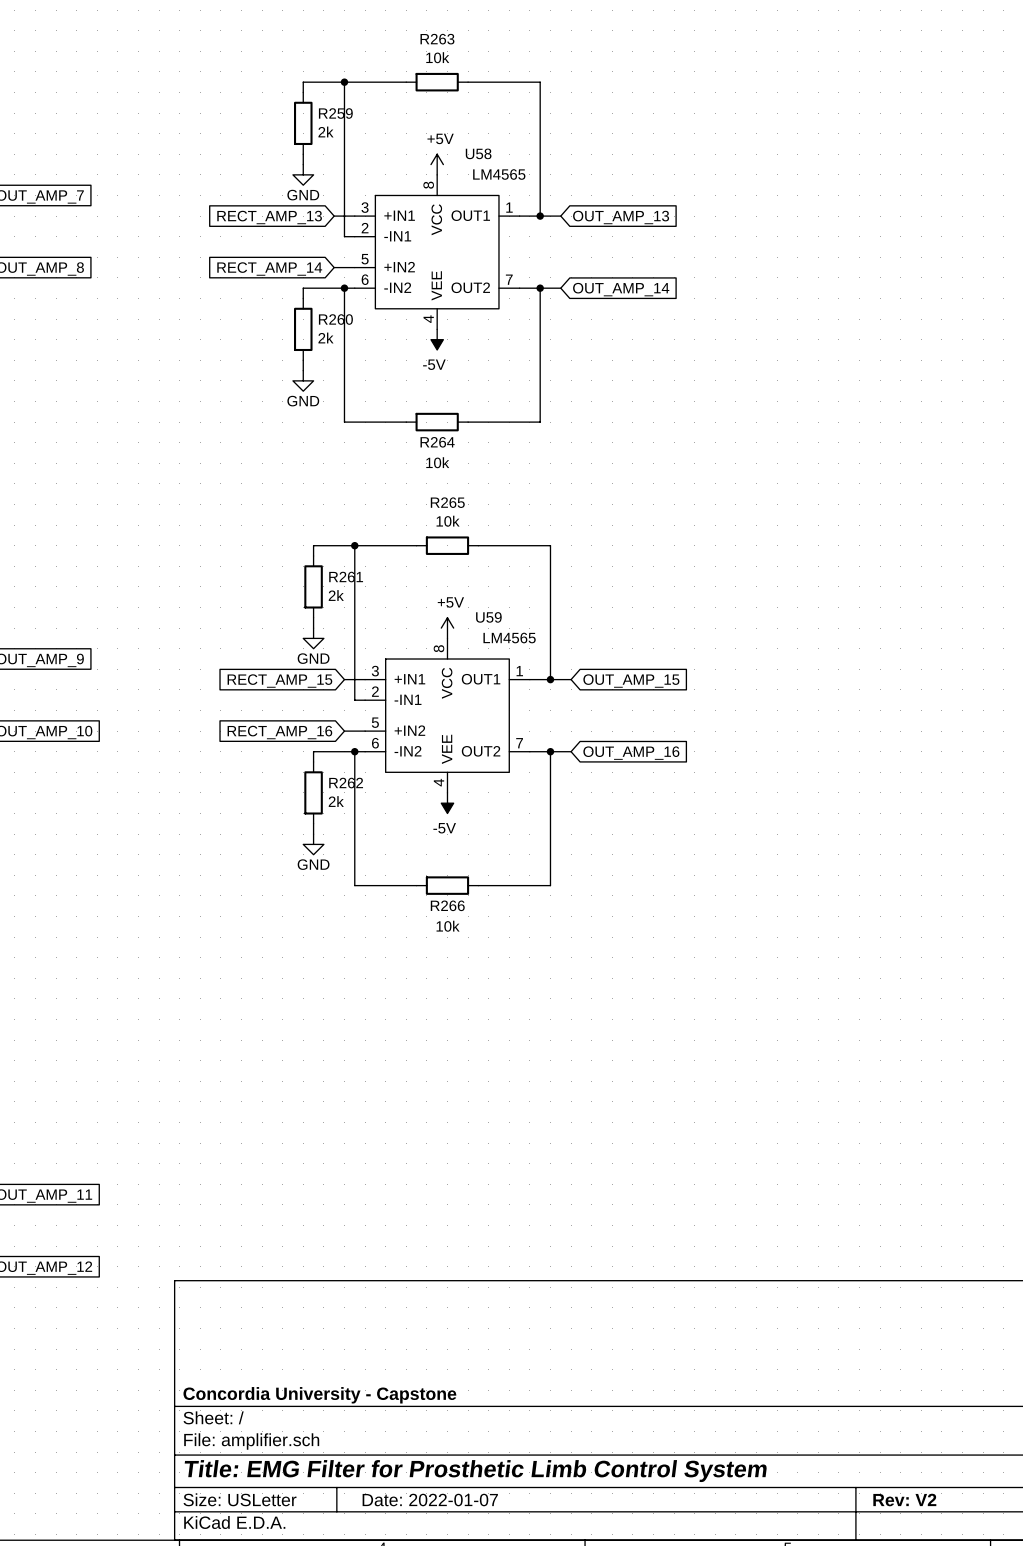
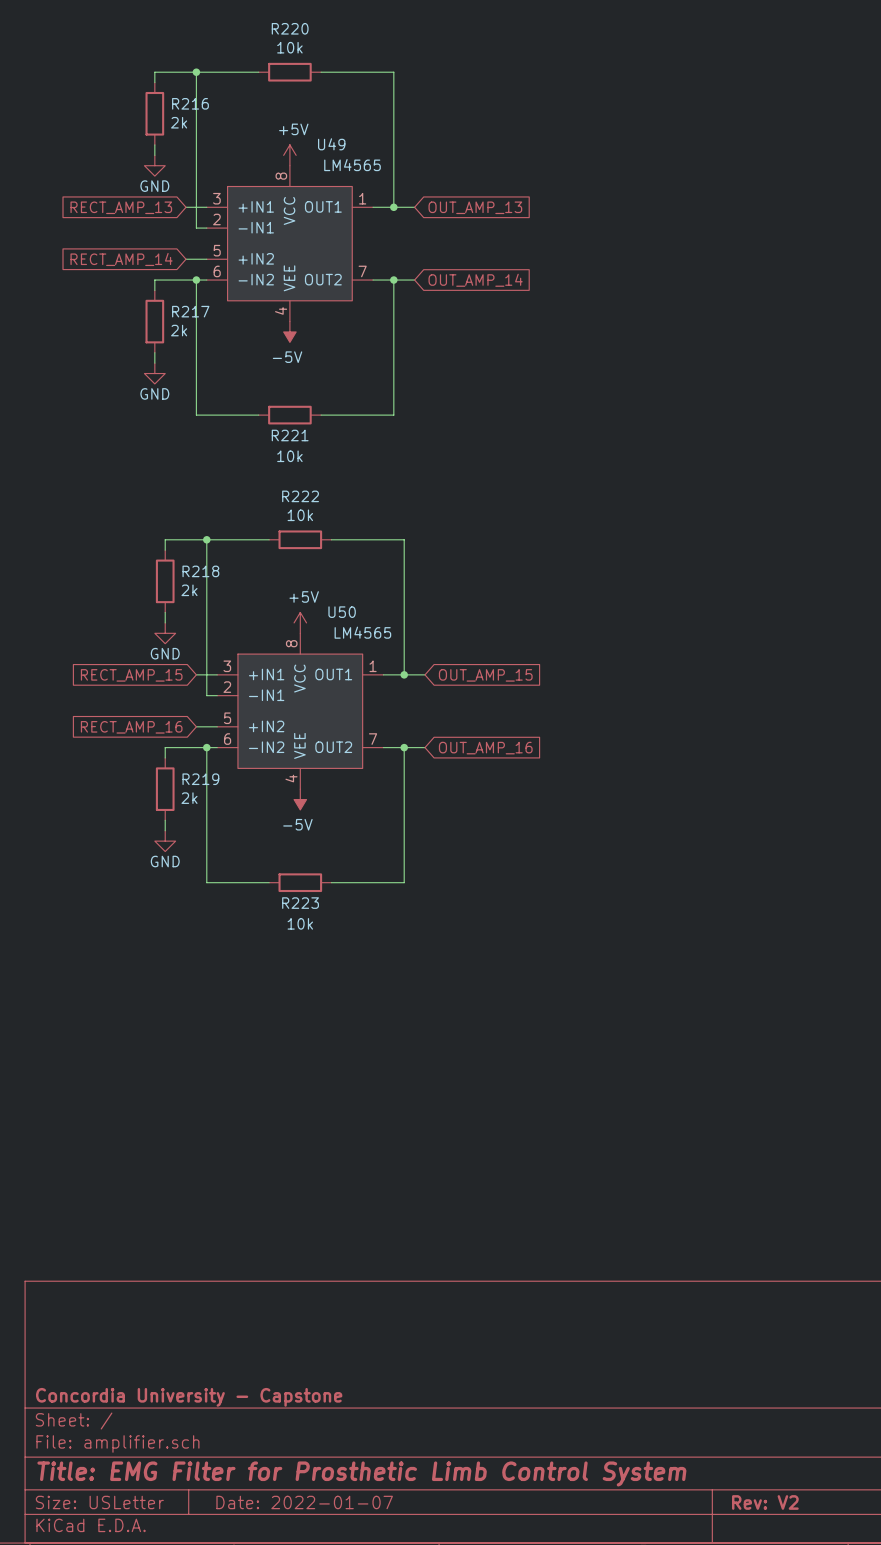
R263 name: R263 (437, 39) -> R220 (290, 28)
R259 name: R259 (335, 113) -> R216 (190, 103)
U58 name: U58 (478, 153) -> U49 (331, 144)
R260 name: R260 (335, 319) -> R217 (190, 311)
R264 name: R264 (437, 442) -> R221 (290, 435)
R265 name: R265 (447, 502) -> R222 (300, 496)
R261 name: R261 (346, 577) -> R218 (200, 571)
U59 name: U59 (488, 617) -> U50 (342, 612)
R262 name: R262 (346, 783) -> R219 (200, 779)
R266 name: R266 (447, 905) -> R223 (300, 903)

